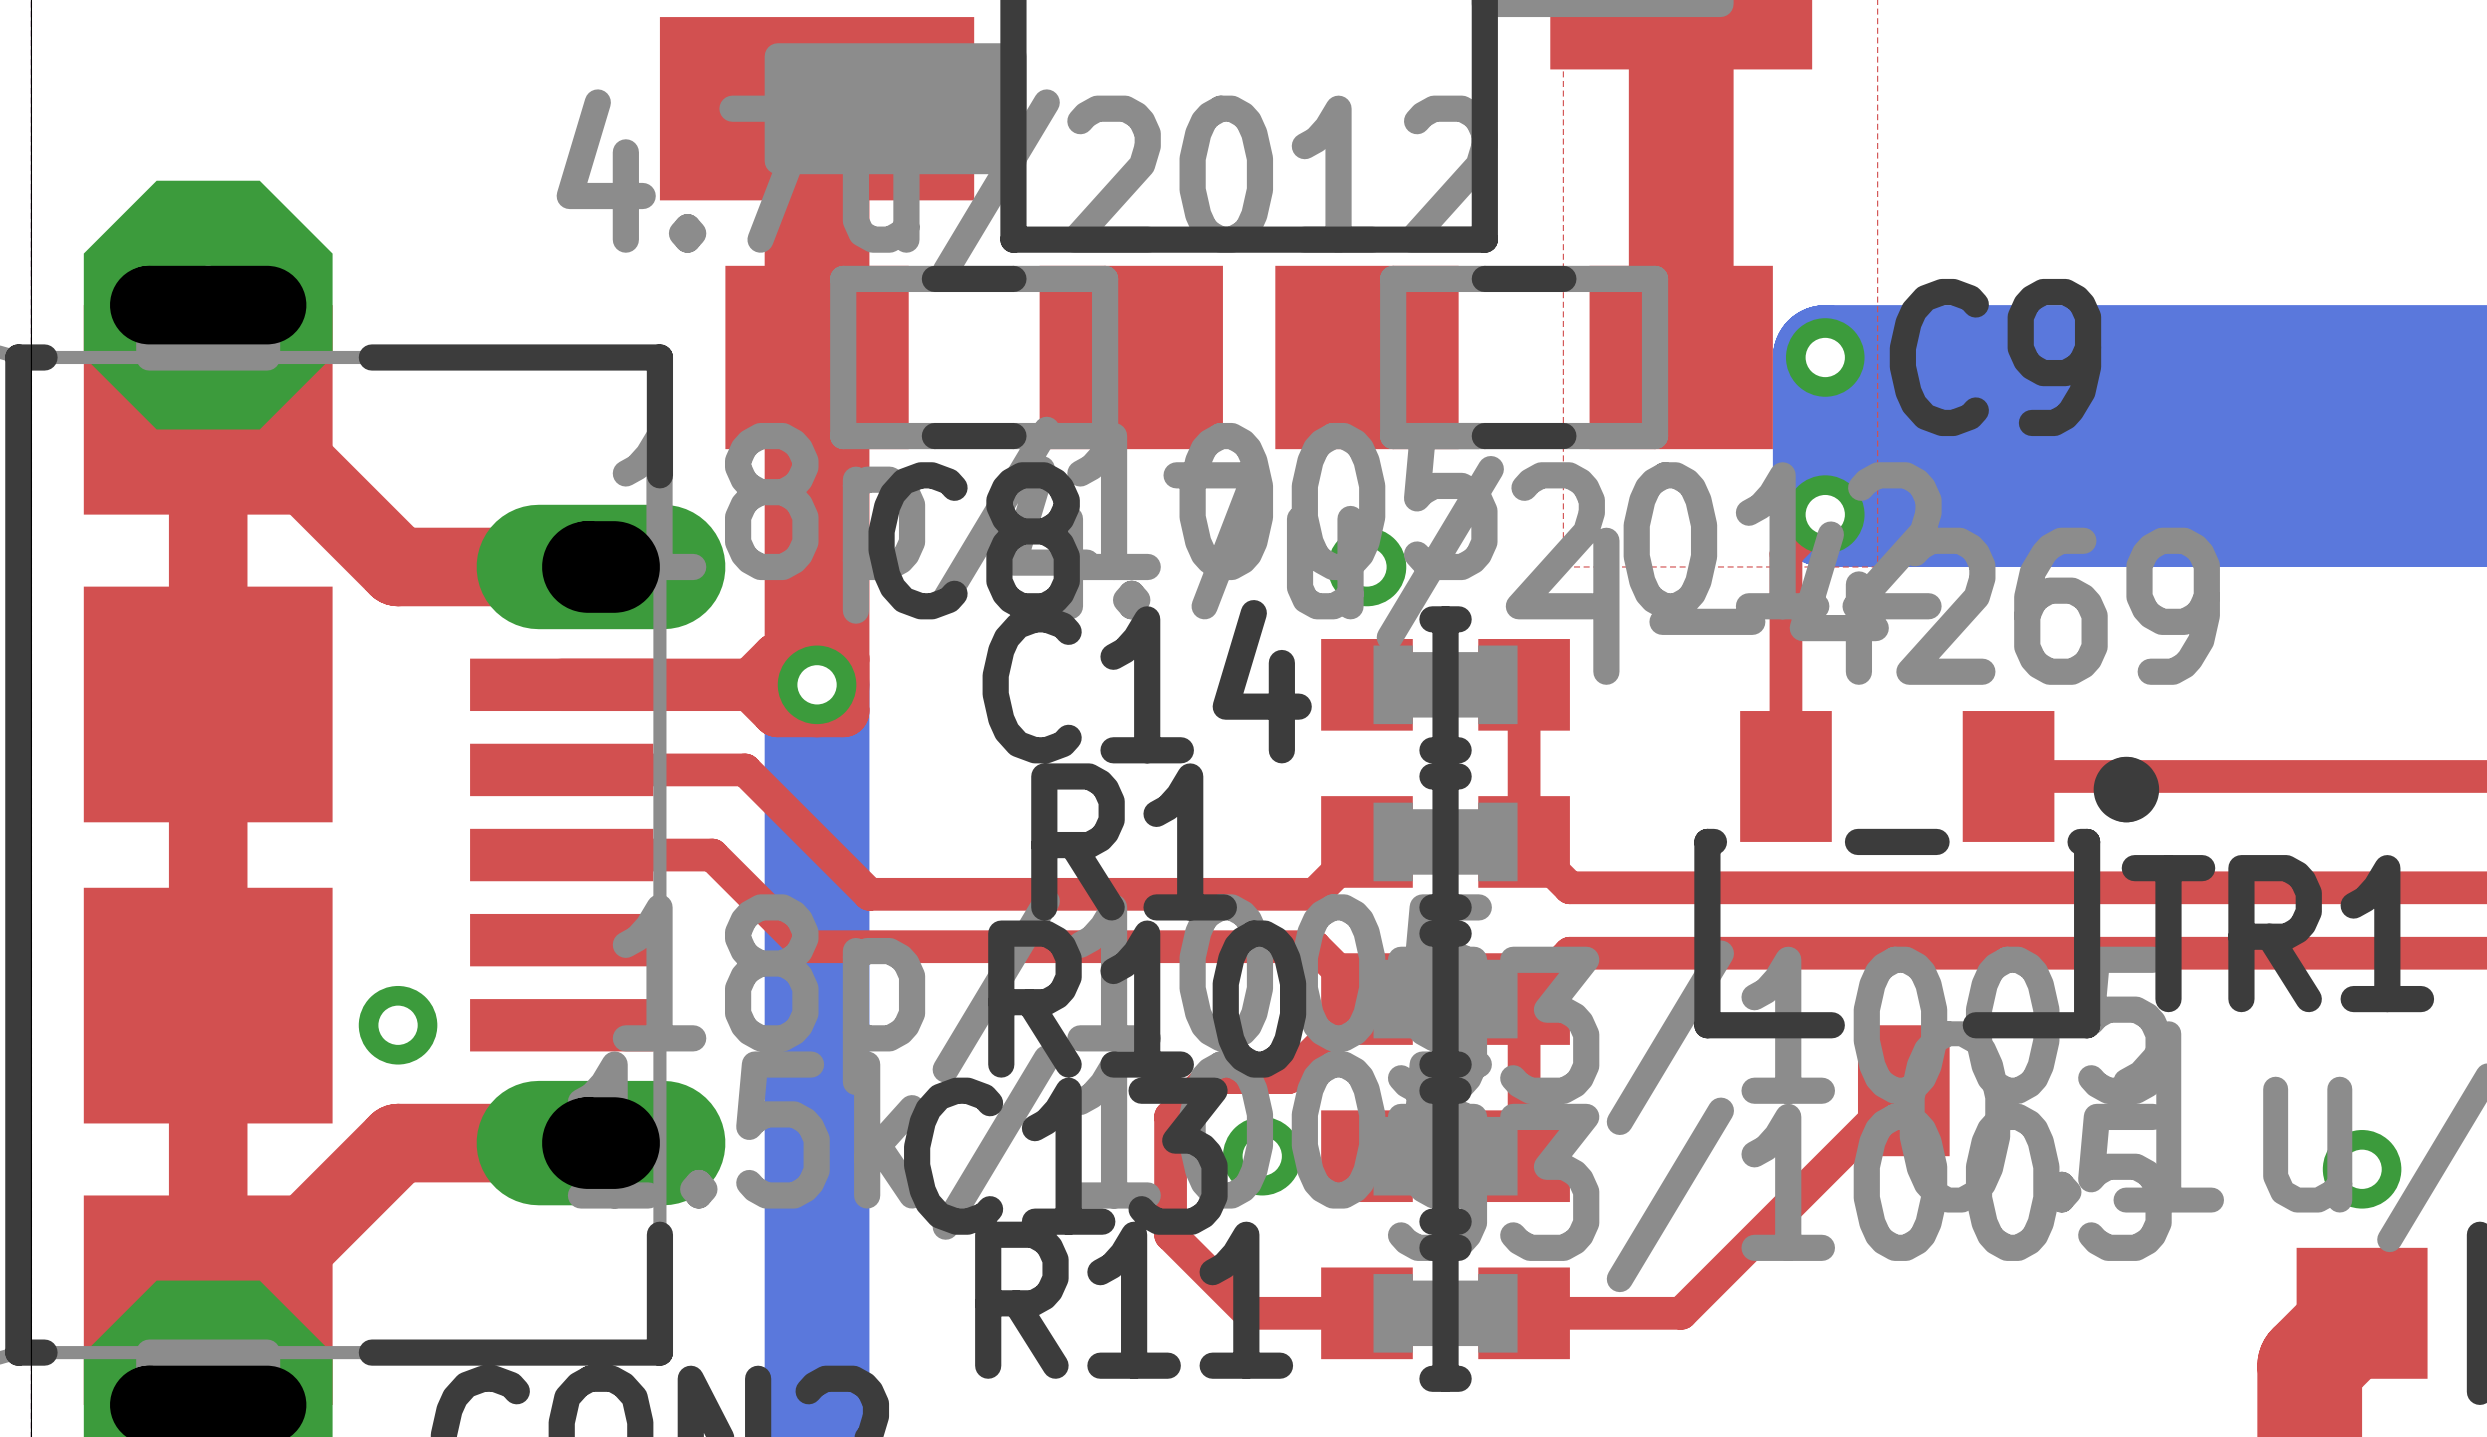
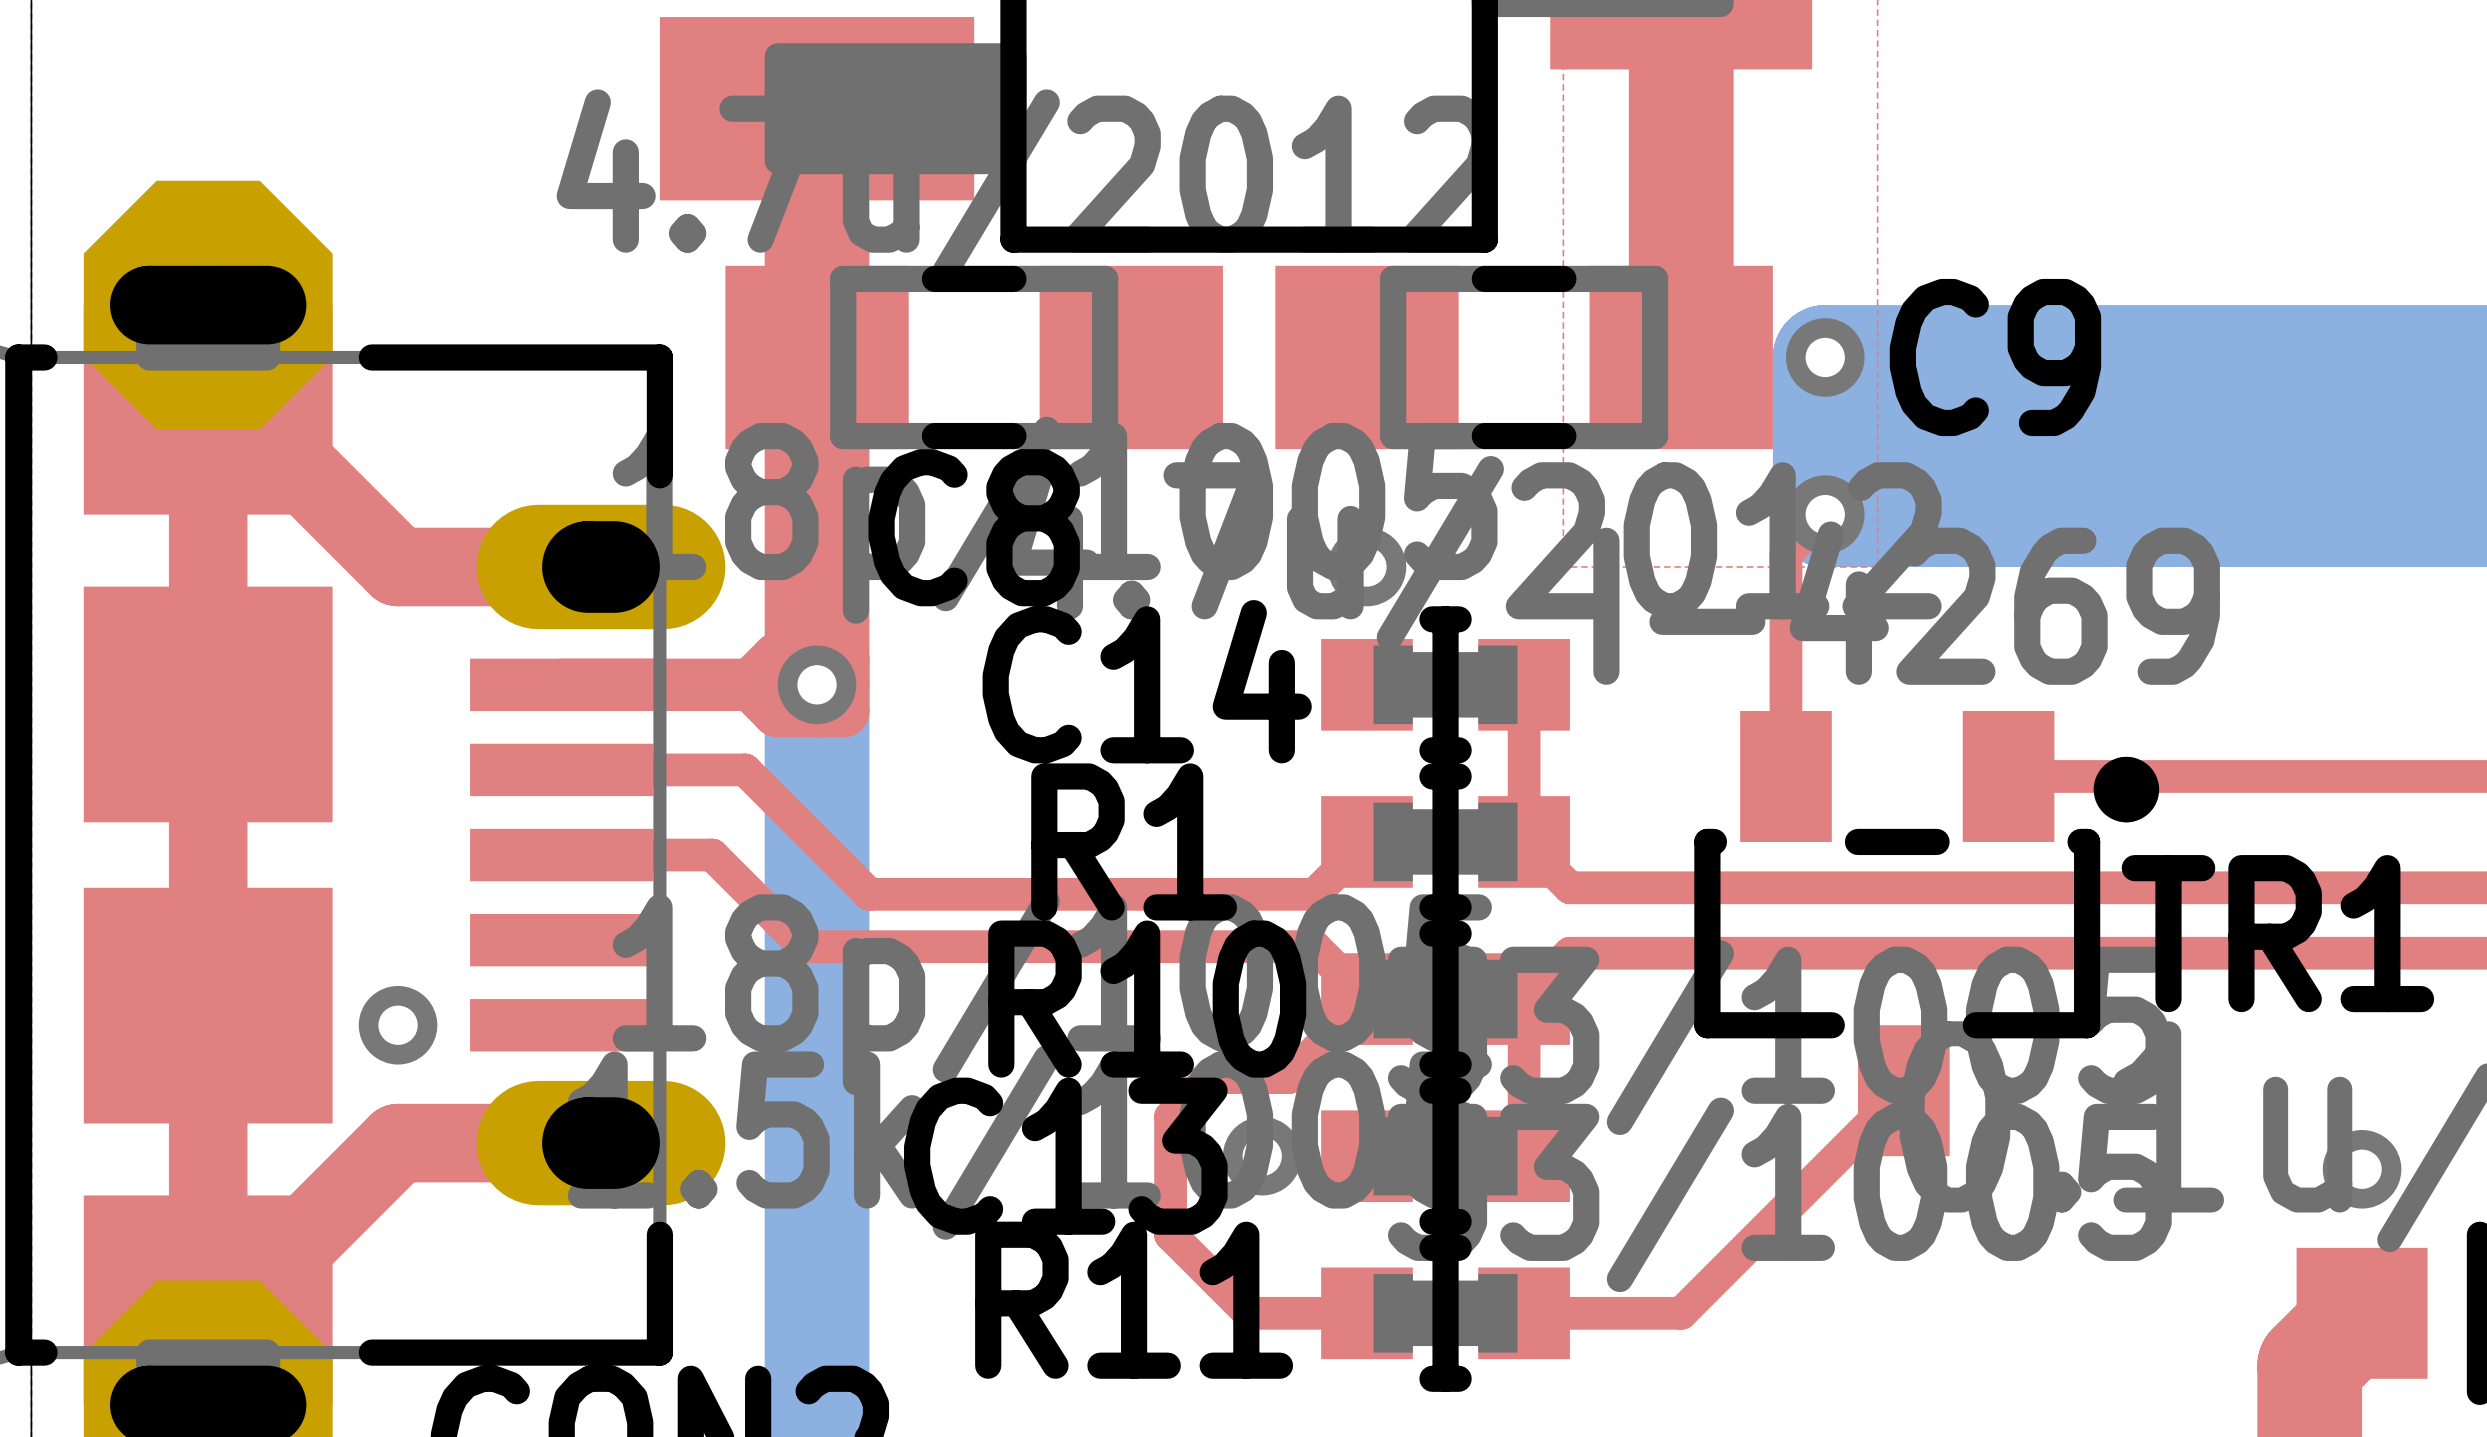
C8 name position: C8 (974, 540) -> C8 (974, 527)

